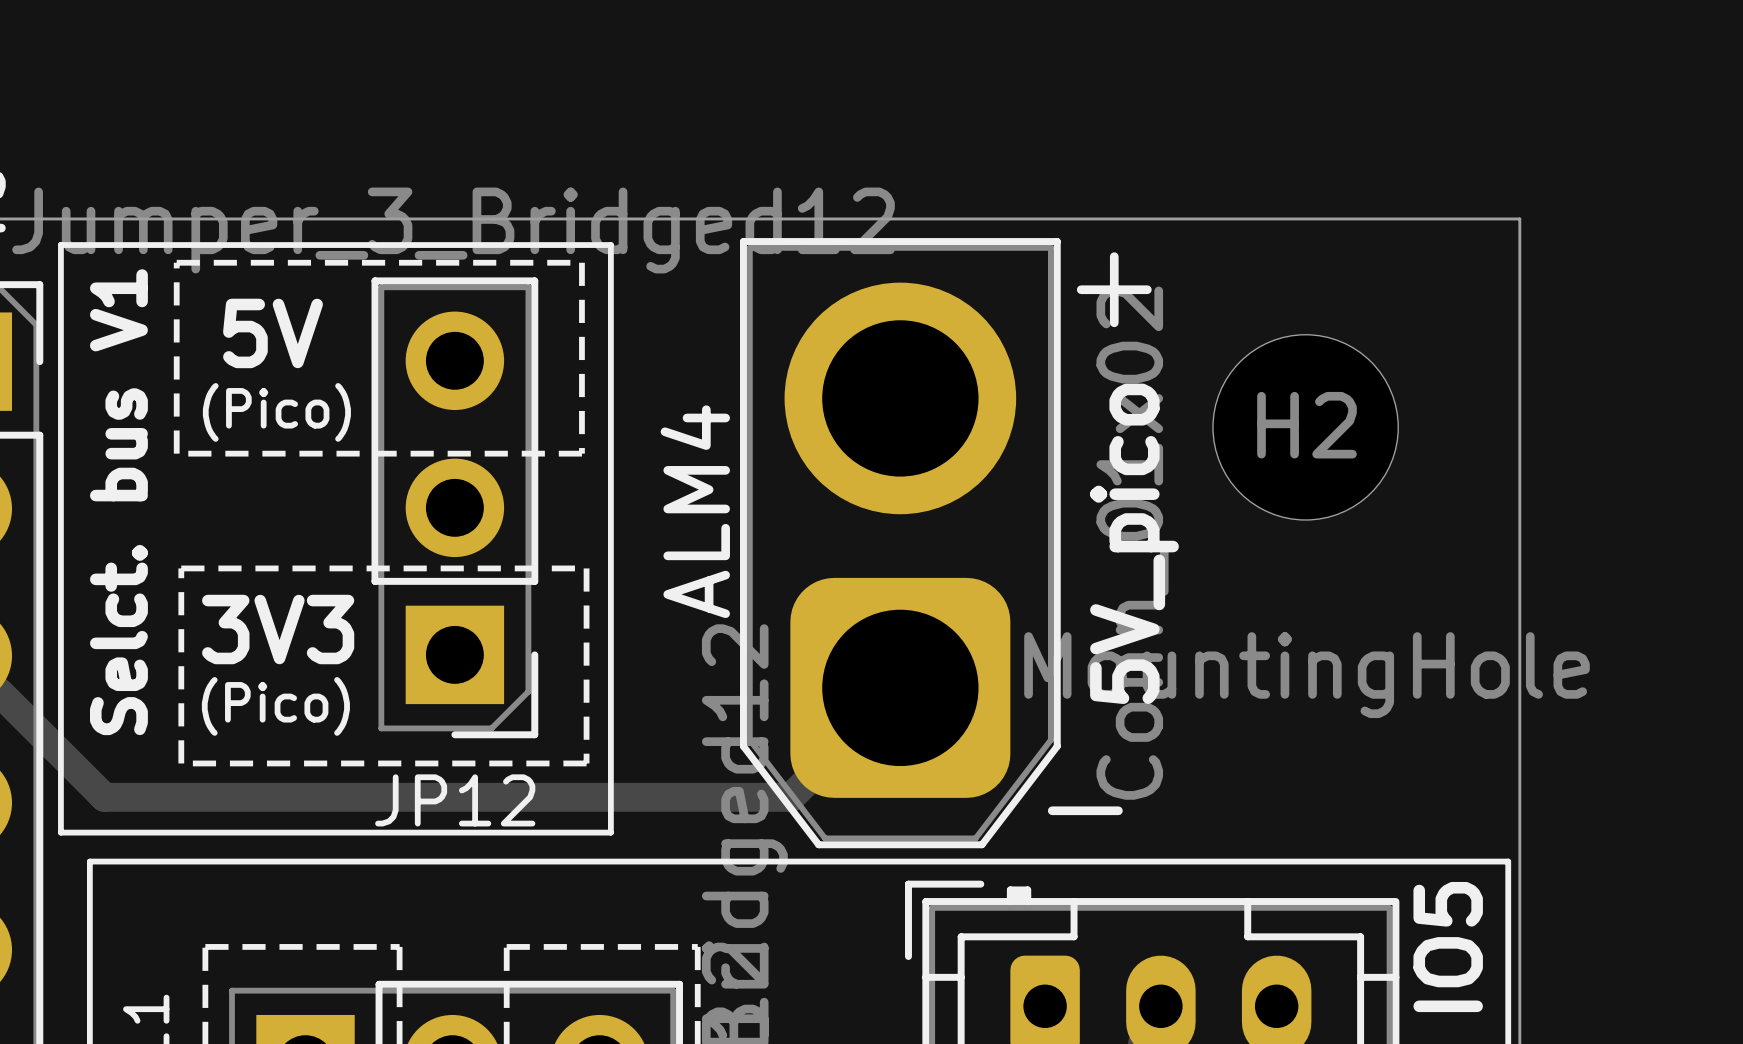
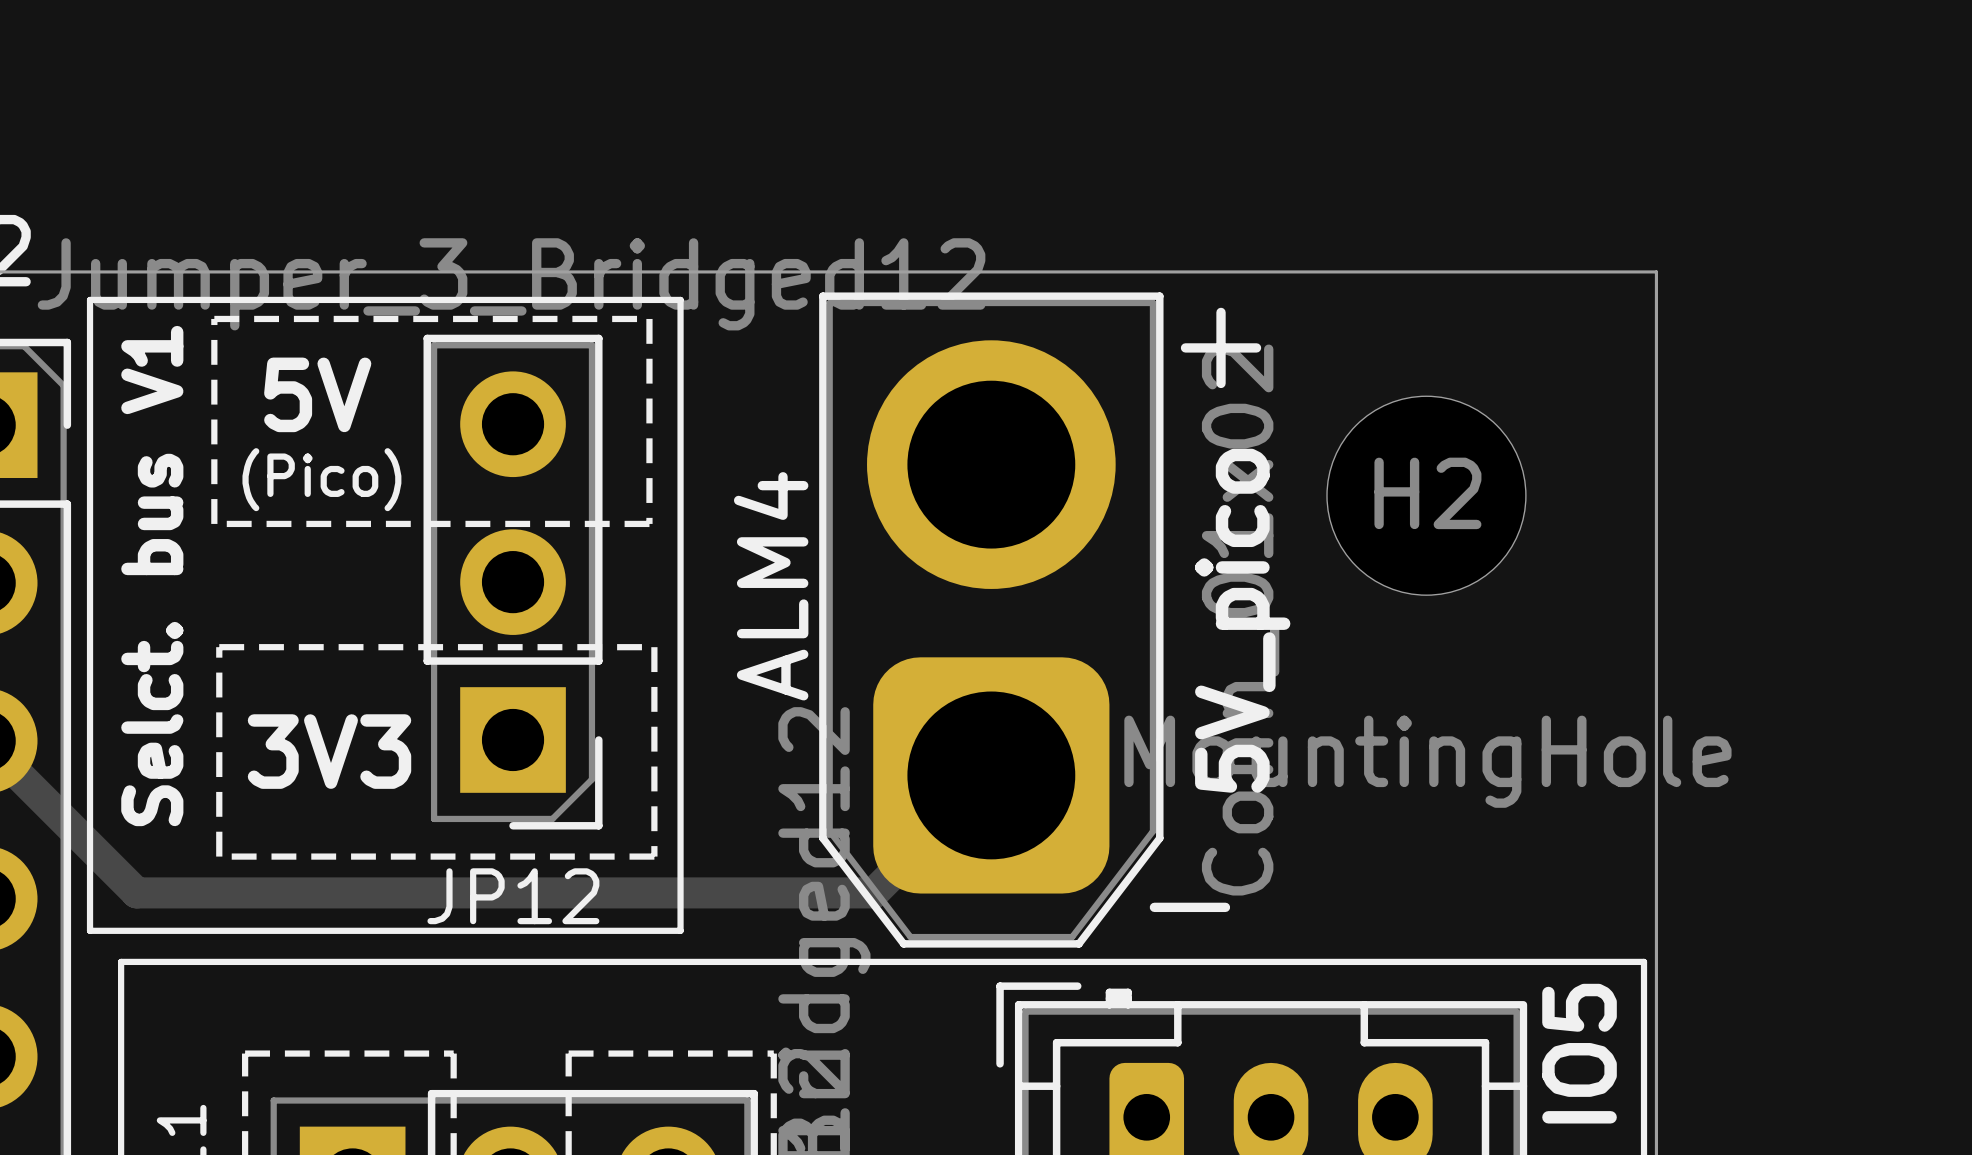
text position: 3V3 (278, 629) -> 3V3 (329, 751)
text: (Pico) (275, 706) -> none

